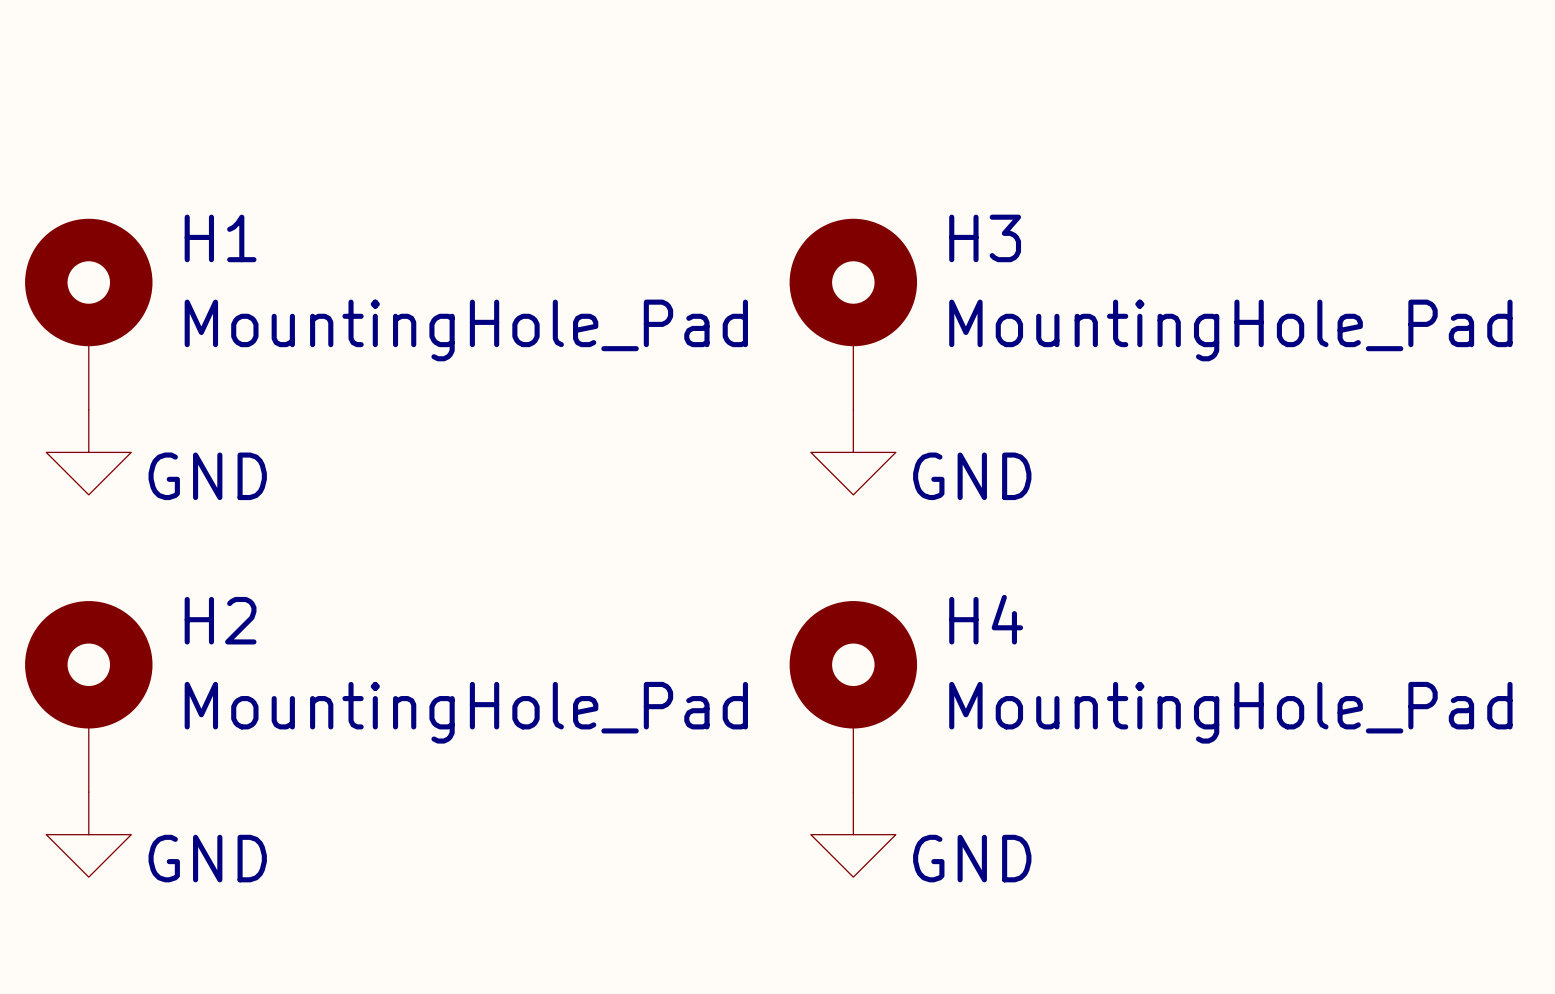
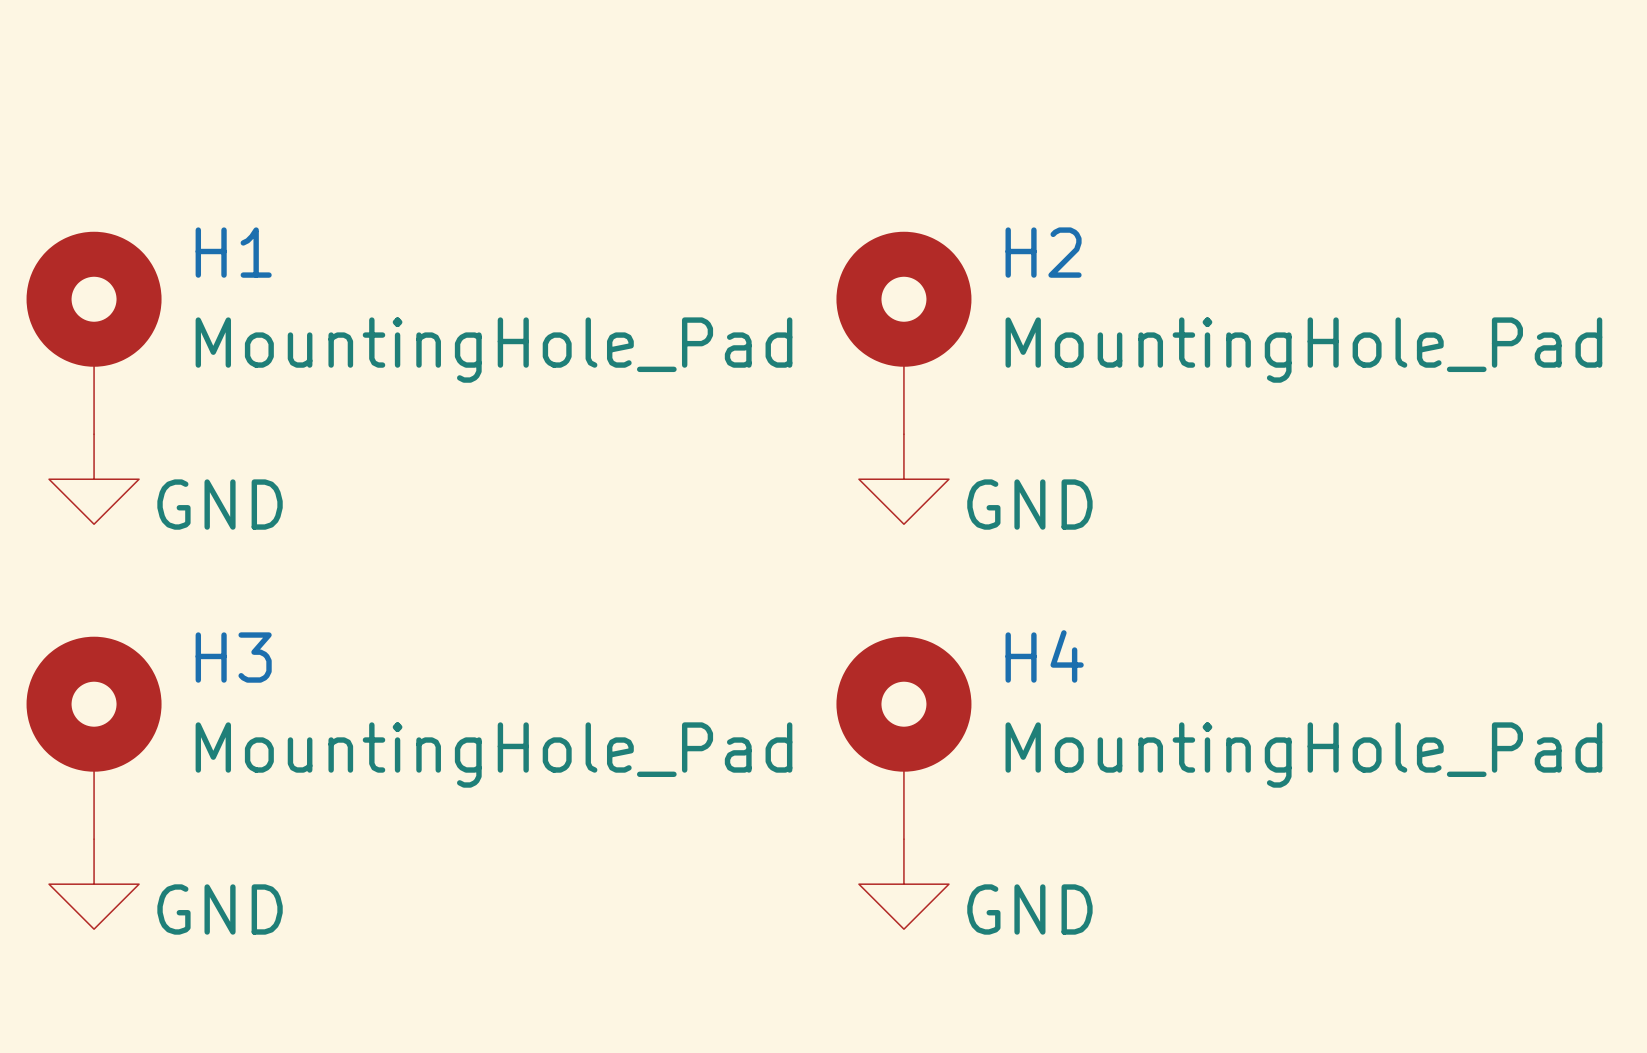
H3 name: H3 (985, 238) -> H2 (1043, 252)
H2 name: H2 (220, 620) -> H3 (233, 657)

